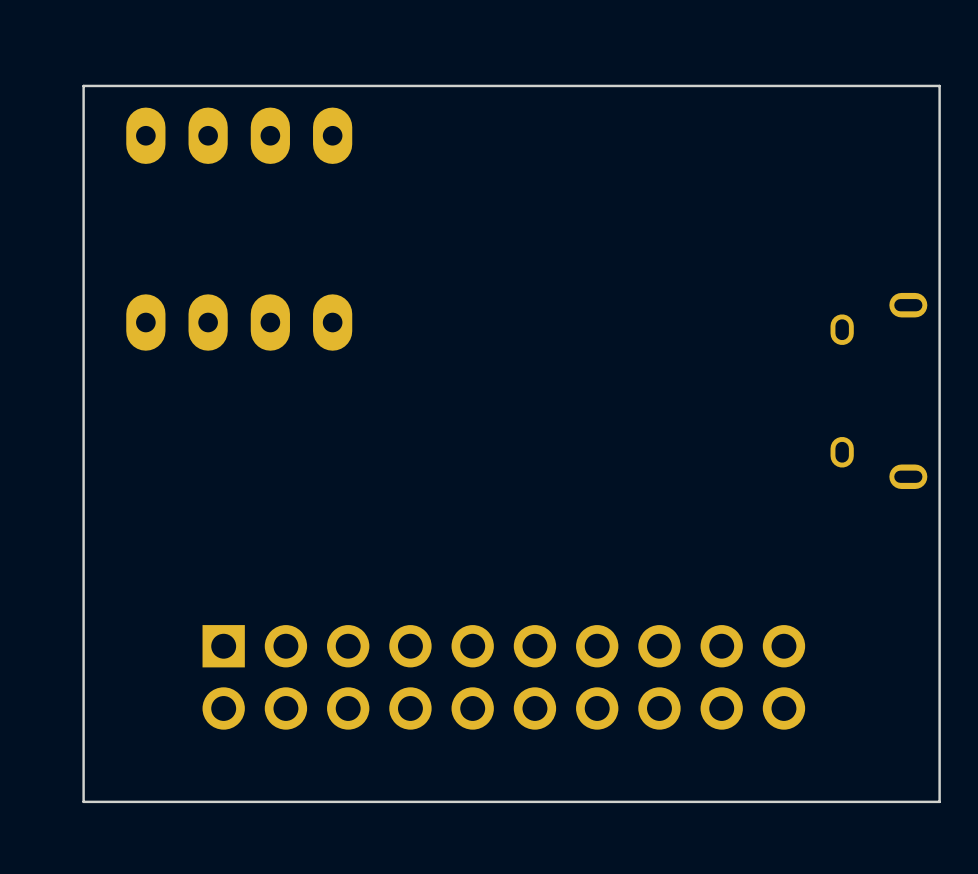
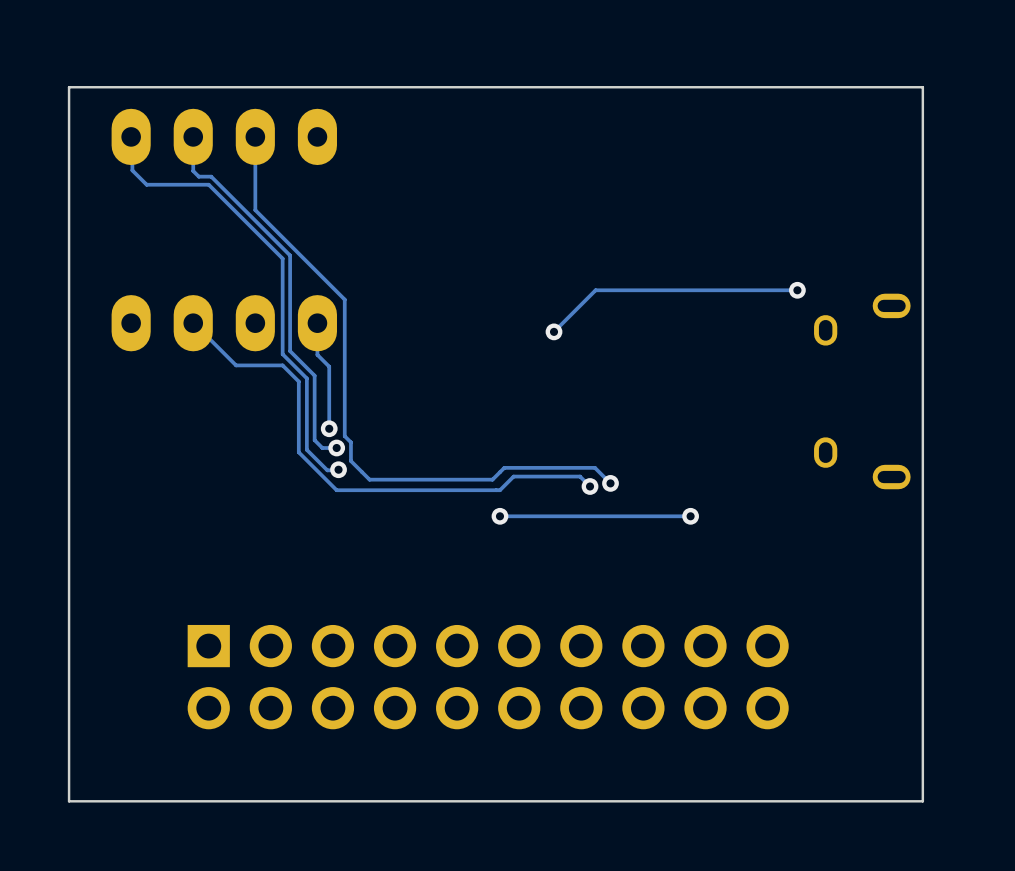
track: none -> (193, 136) (193, 171) (198, 176) (211, 176) (290, 255) (290, 351) (314, 375) (314, 440) (322, 448) (336, 448)
track: none -> (255, 136) (255, 210) (344, 299) (344, 436) (350, 442) (350, 461) (369, 479) (492, 479) (504, 467) (594, 467) (610, 483)
track: none -> (132, 149) (132, 170) (146, 184) (208, 184) (282, 258) (282, 354) (306, 378) (306, 449) (327, 470) (338, 469)
track: none -> (797, 290) (595, 290) (554, 331)
via: none -> (797, 290)
track: none -> (193, 323) (236, 365) (282, 365) (298, 381) (298, 452) (336, 490) (499, 490) (513, 476) (580, 476) (590, 486)
track: none -> (317, 323) (317, 354) (329, 366) (329, 428)
via: none -> (554, 331)
via: none -> (329, 428)
via: none -> (336, 448)
via: none -> (338, 469)
via: none -> (610, 483)
via: none -> (590, 486)
via: none -> (499, 516)
track: none -> (690, 516) (499, 516)
via: none -> (690, 516)

